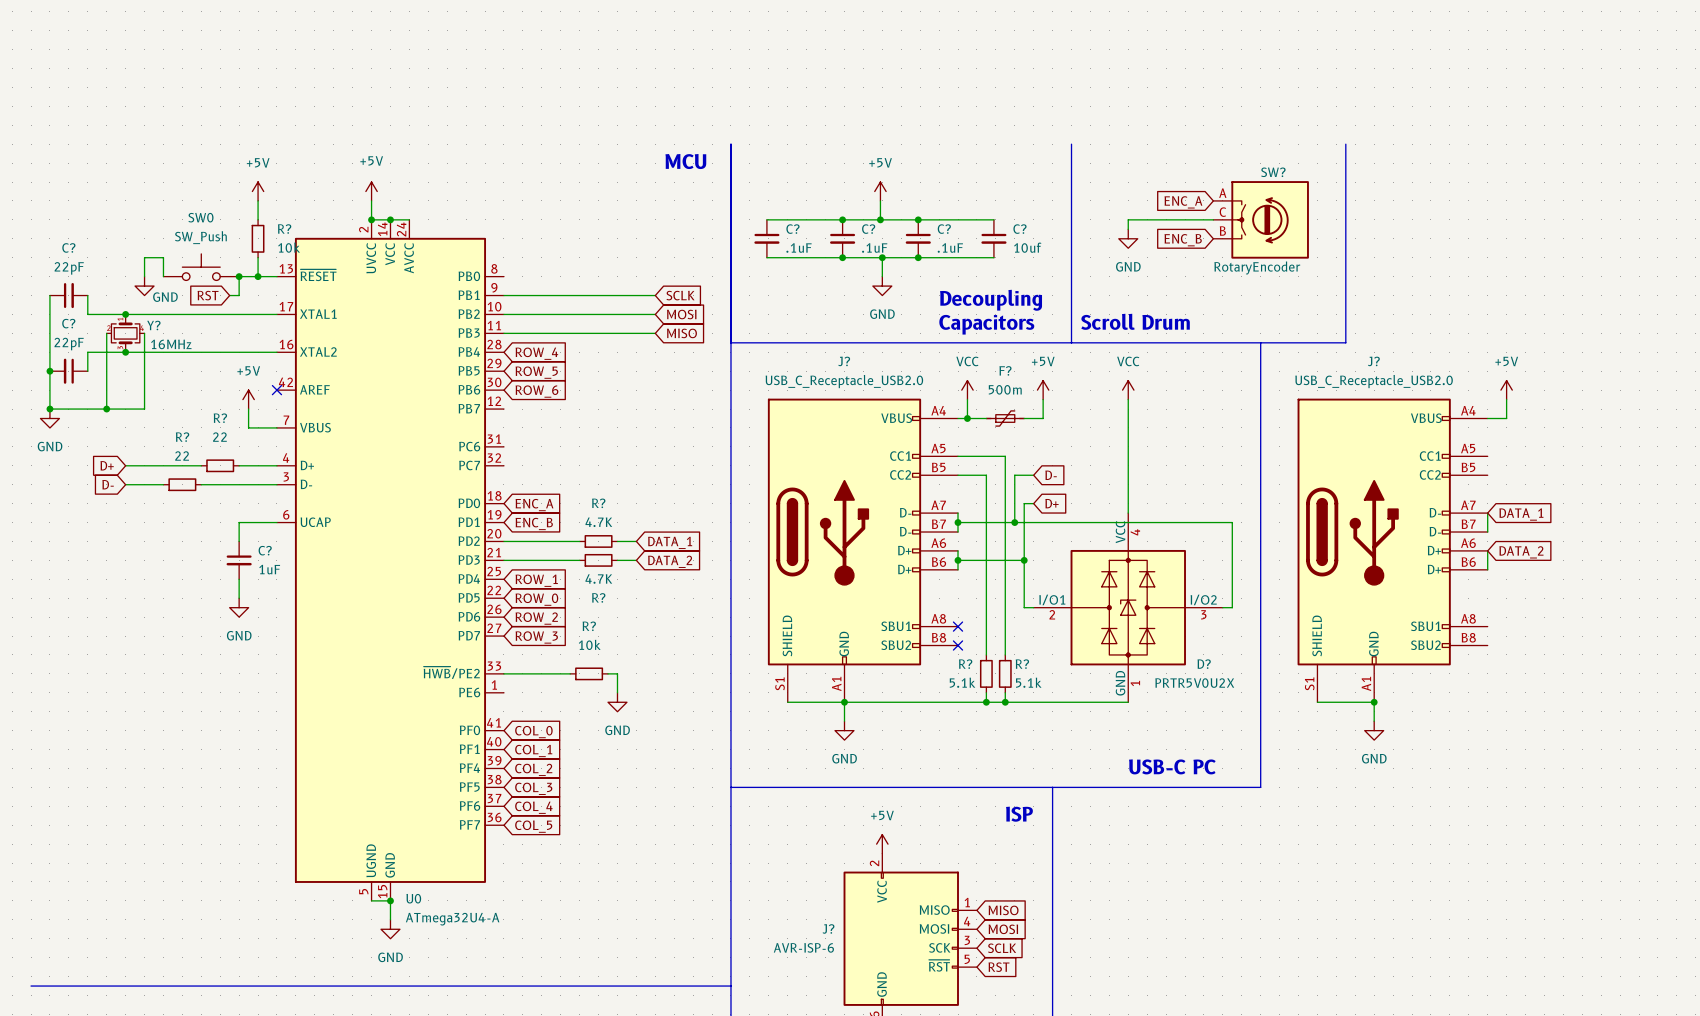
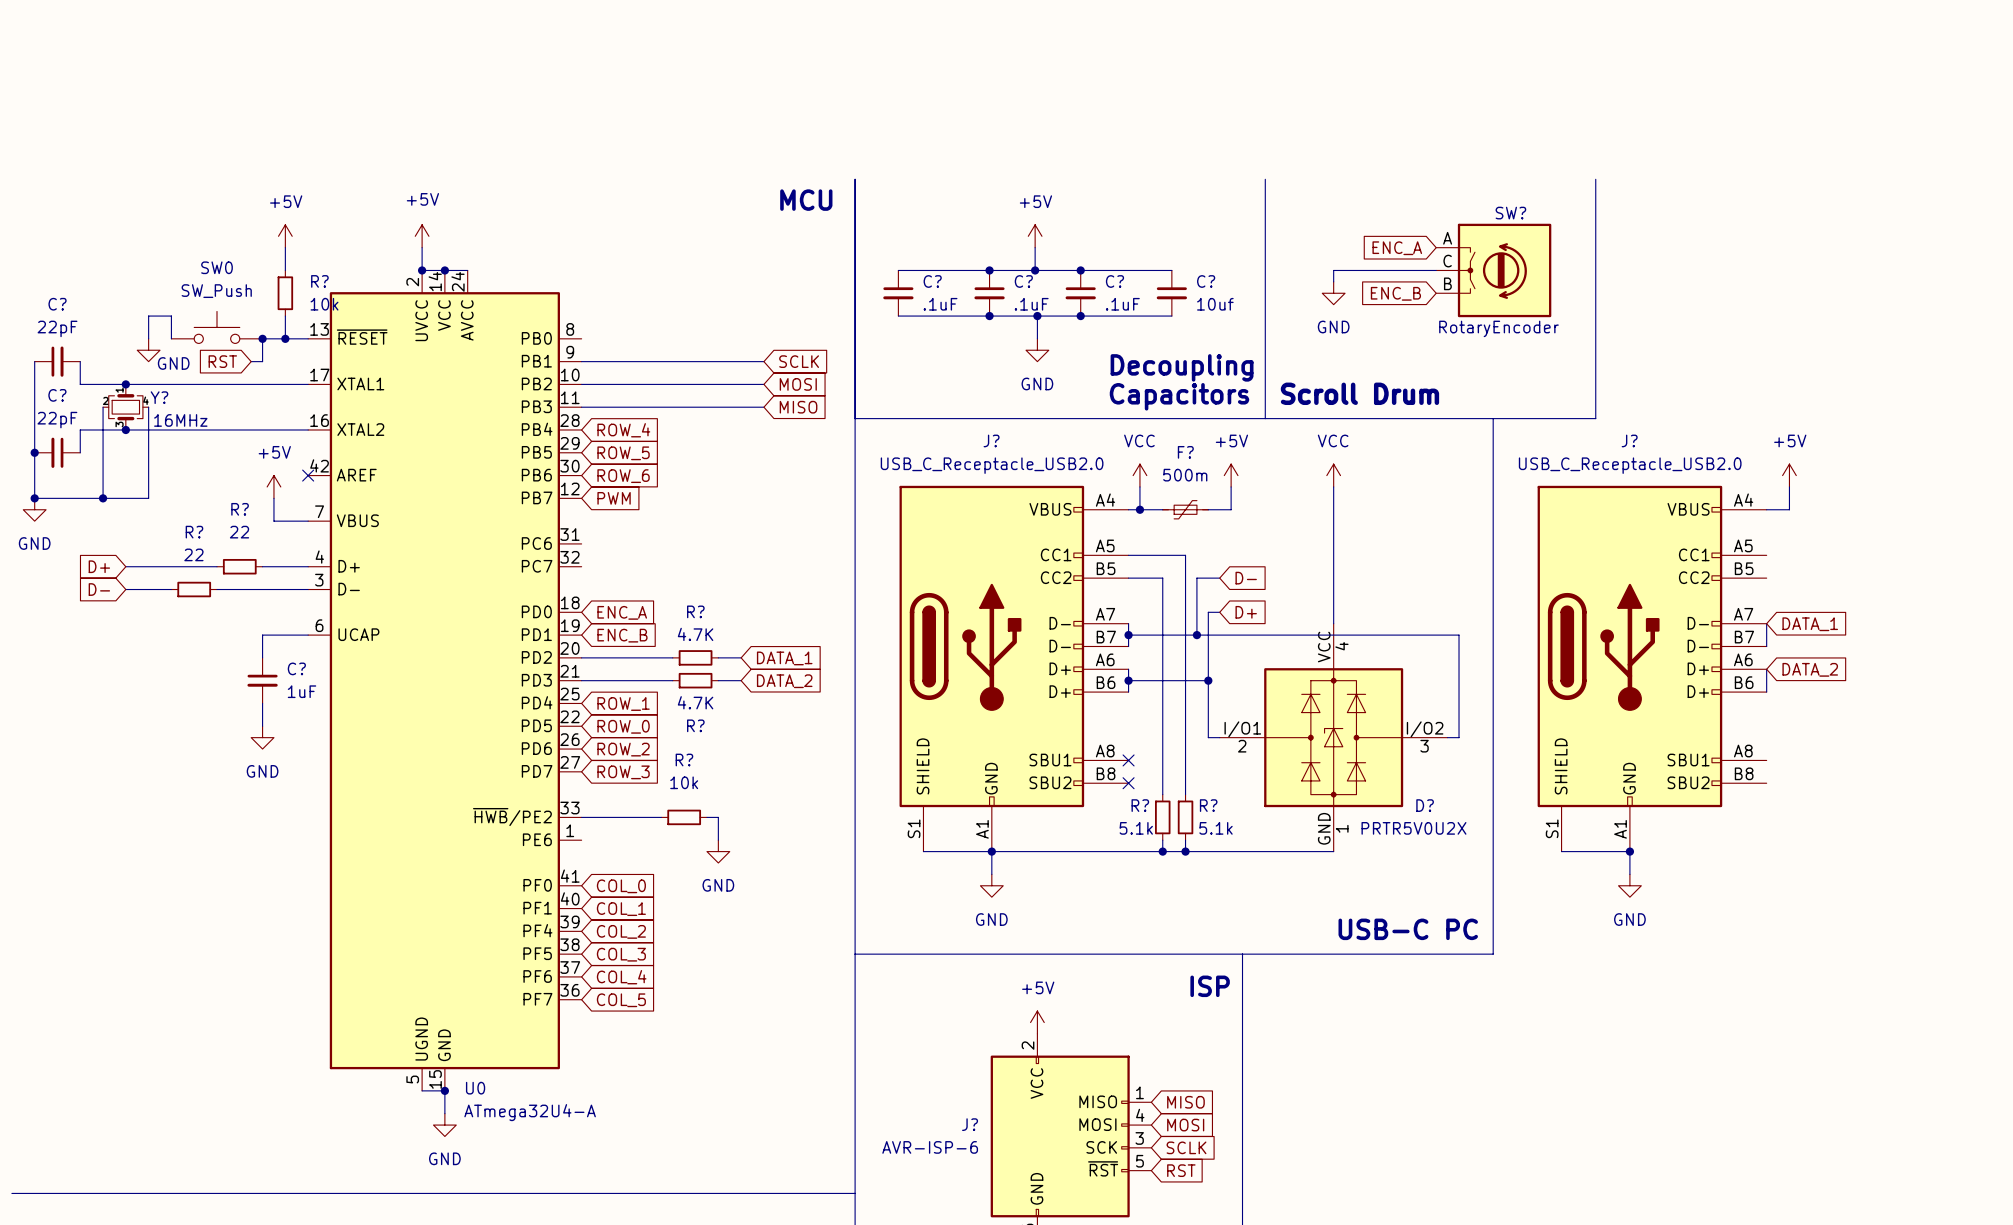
global label: none -> PWM (614, 498)

